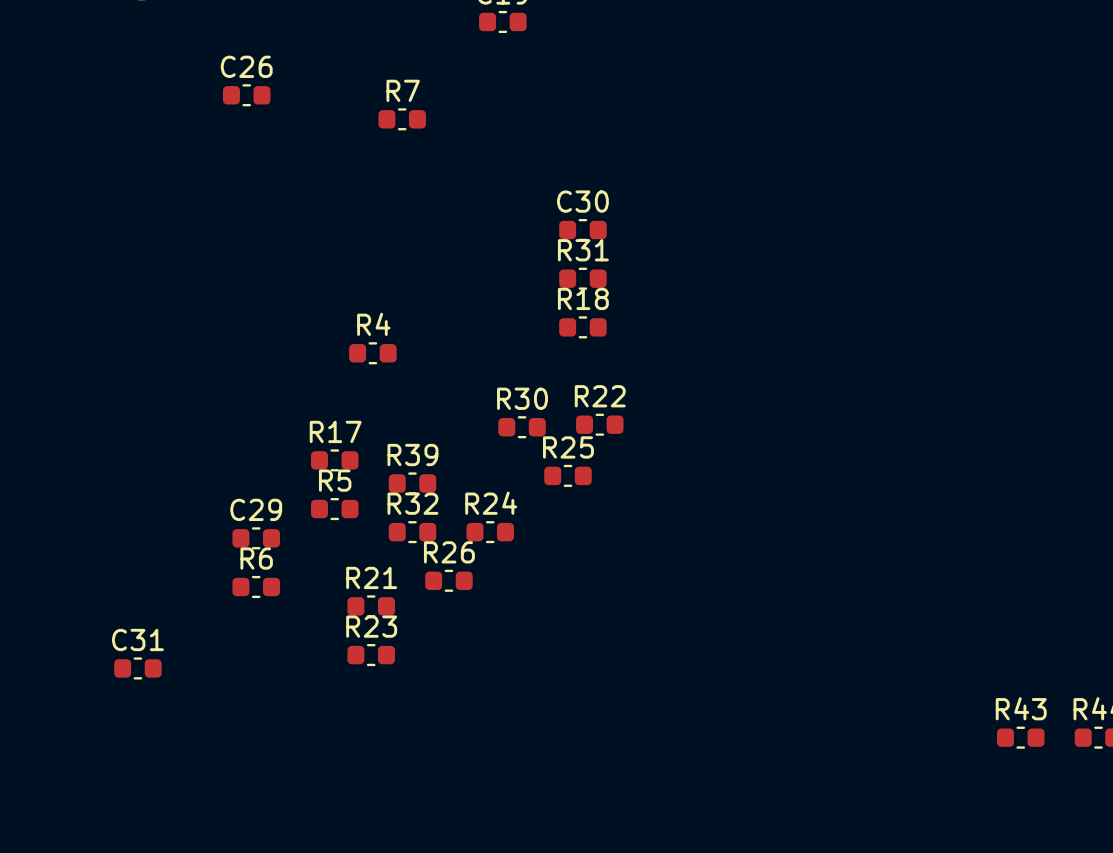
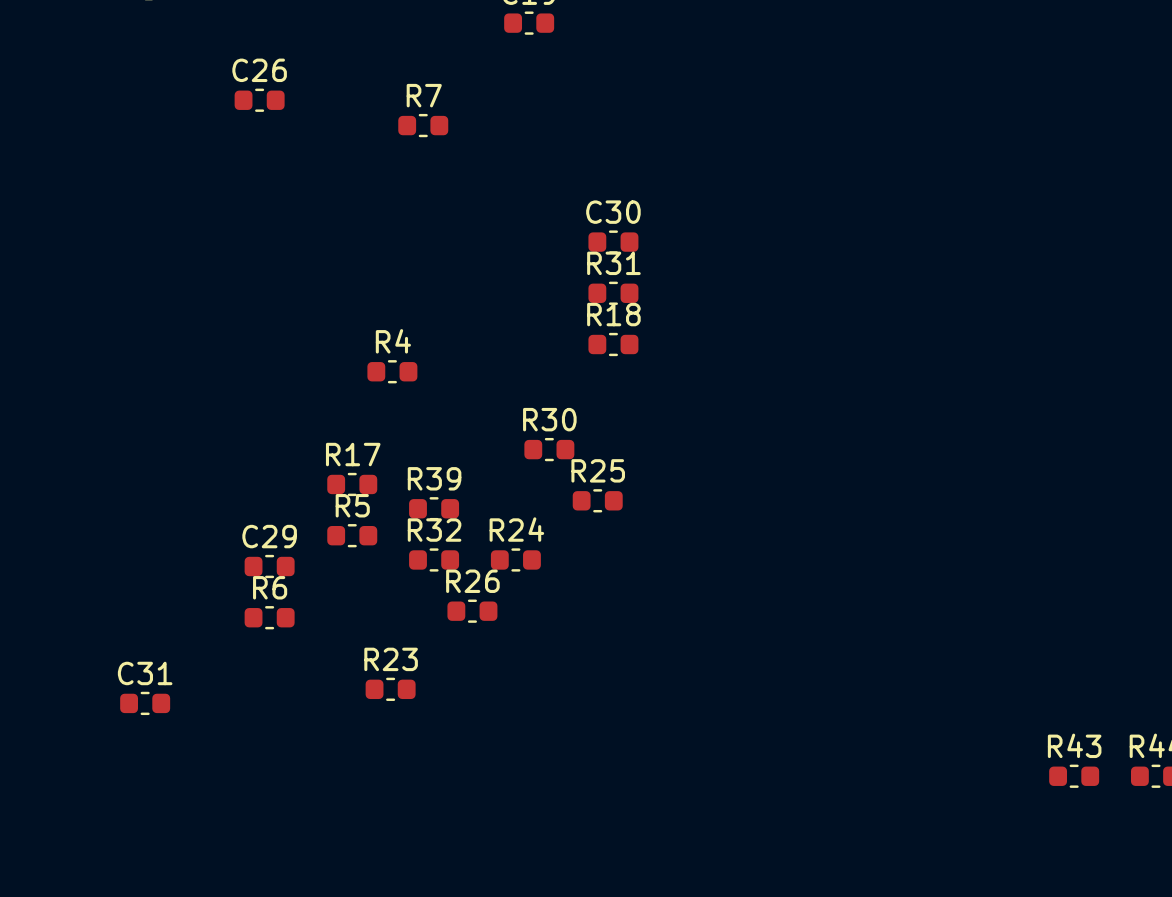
R22: (599, 424) -> none
R21: (371, 606) -> none

